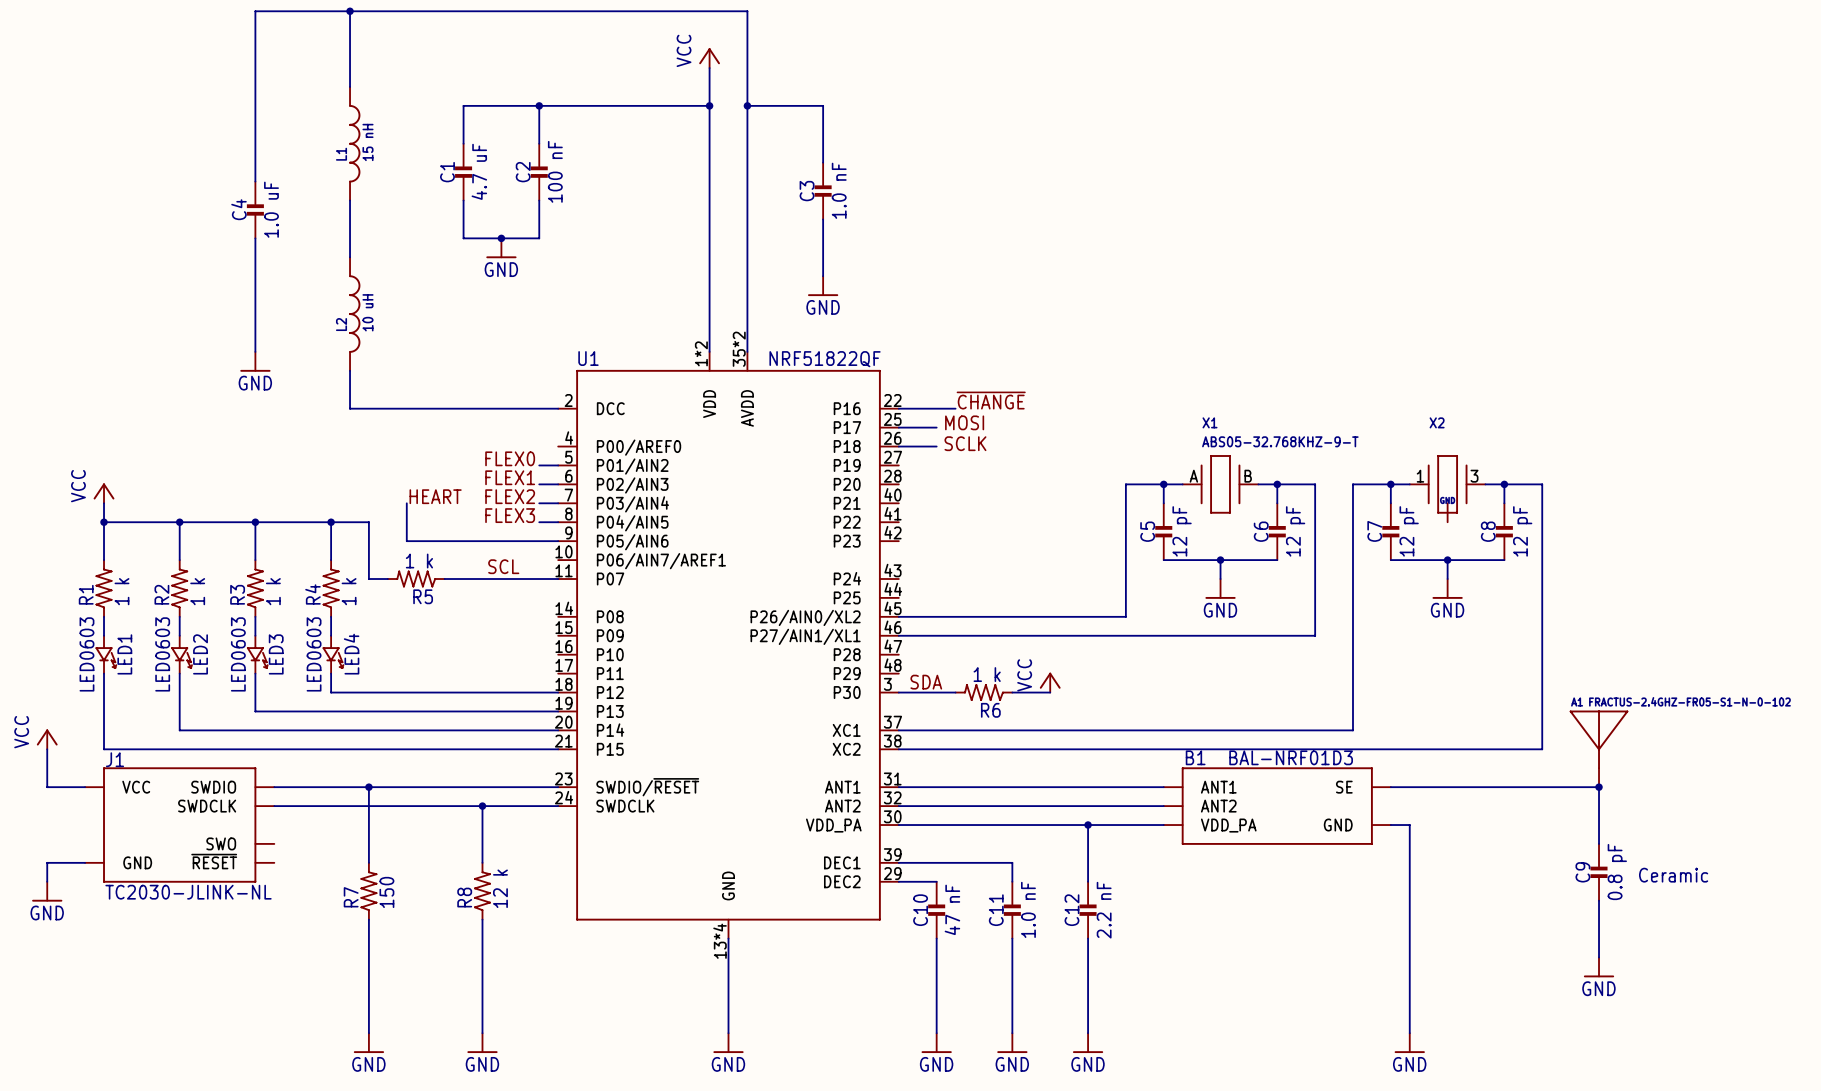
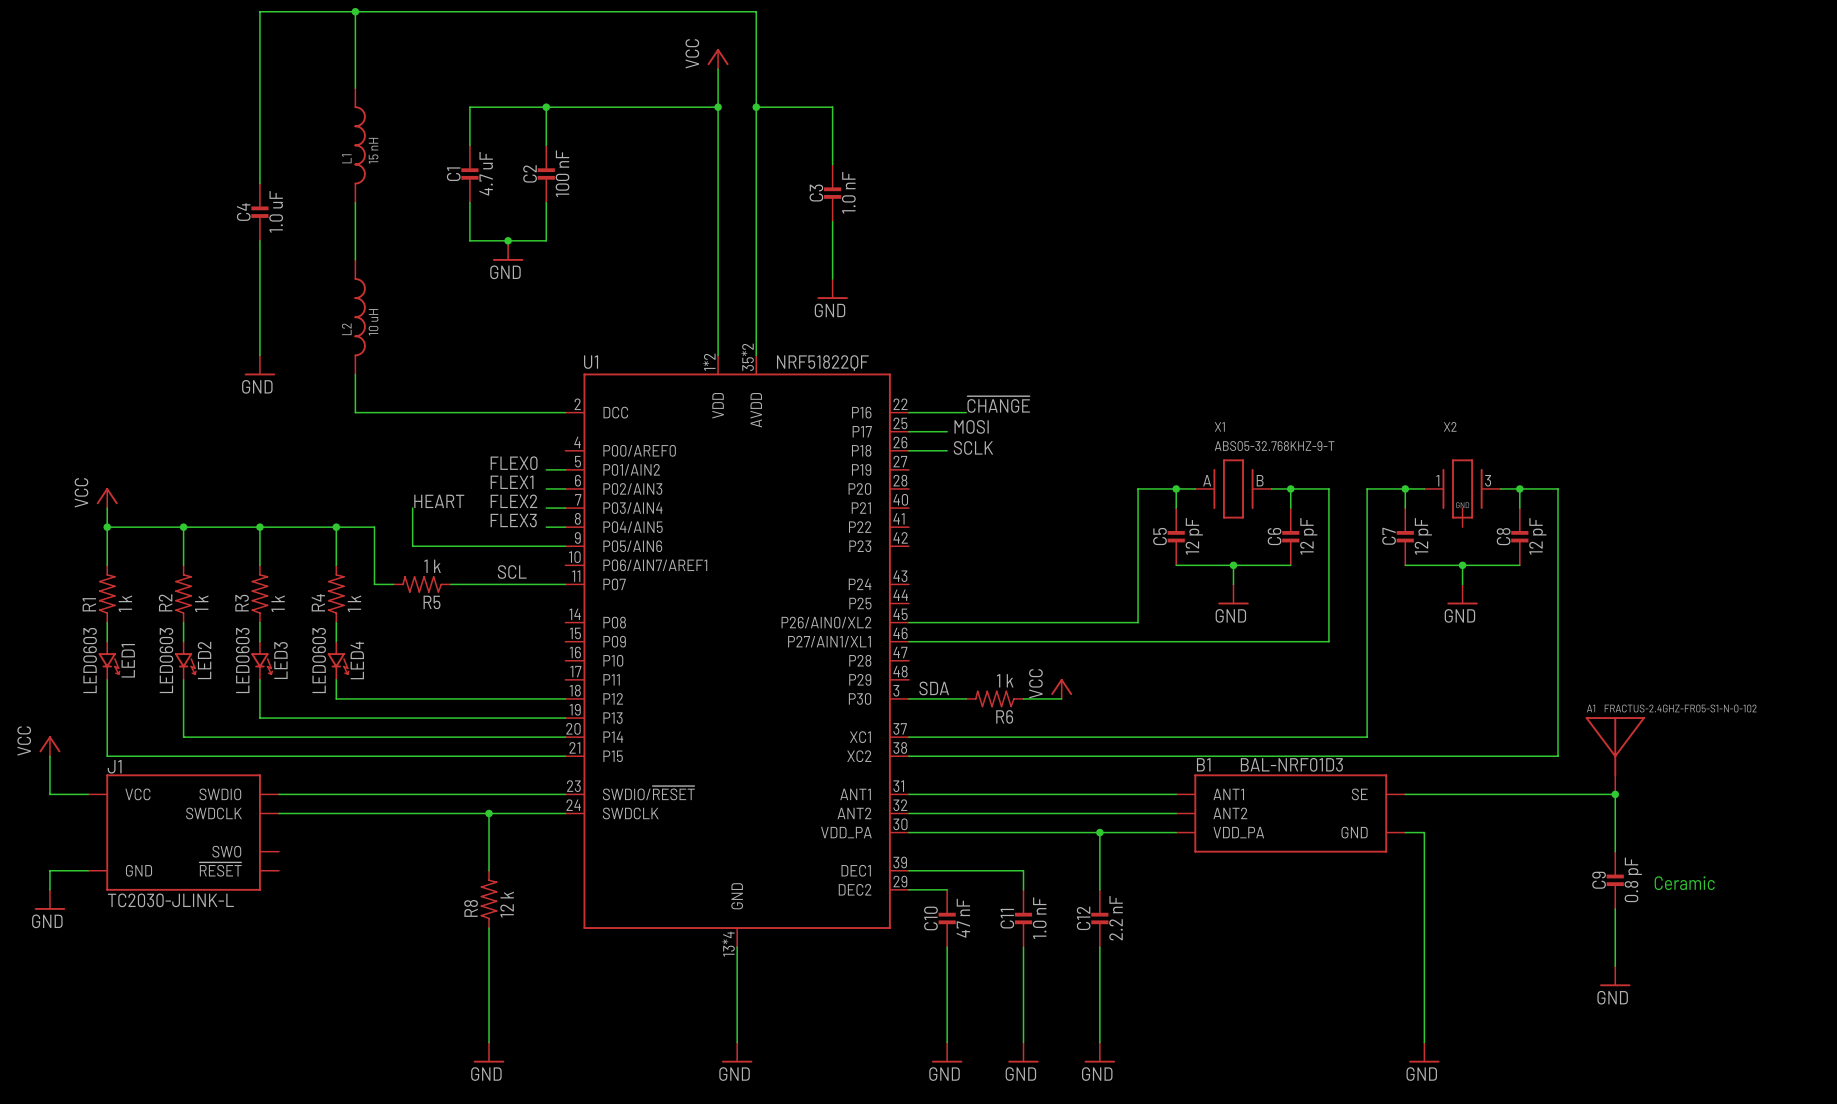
wire: (368, 787) (368, 862) -> none
junction: (368, 787) -> none
R7: 150 (368, 891) -> none
J1 value: TC2030-JLINK-NL (188, 892) -> TC2030-JLINK-L (170, 900)
wire: (368, 919) (368, 1033) -> none
power symbol: GND (368, 1043) -> none

